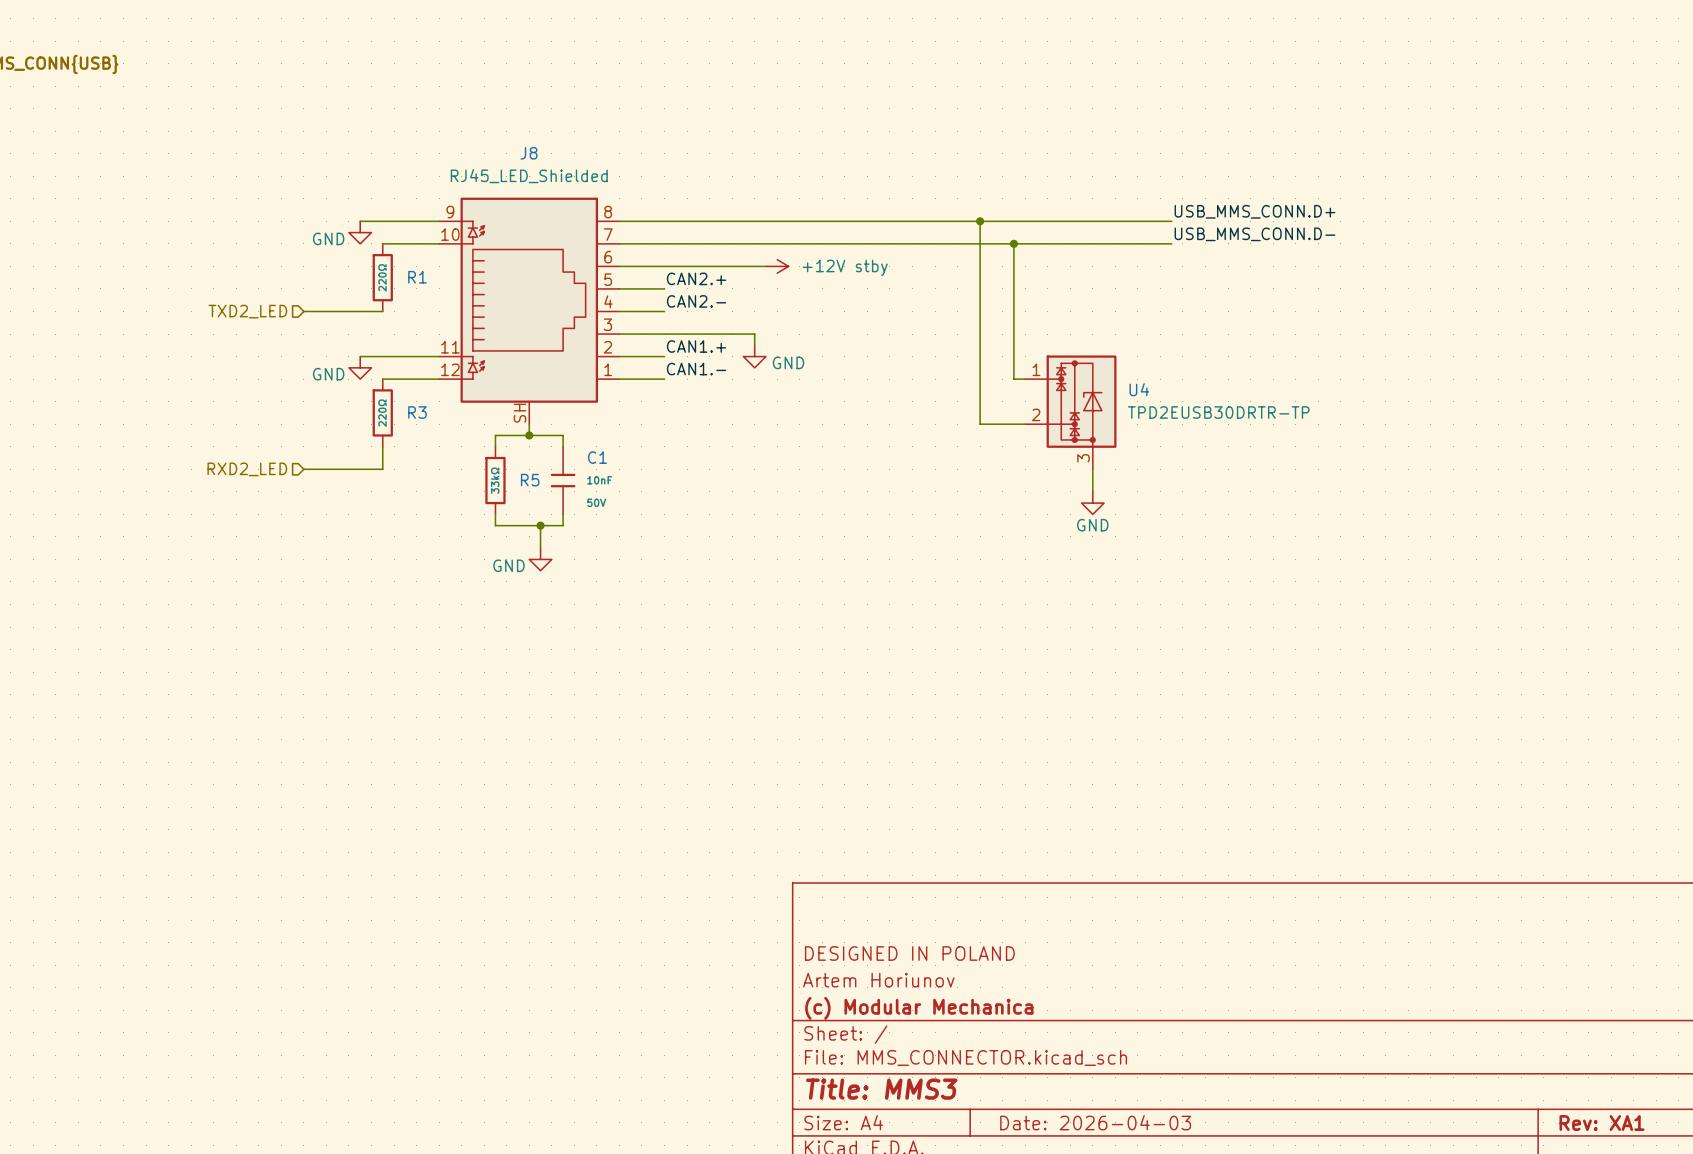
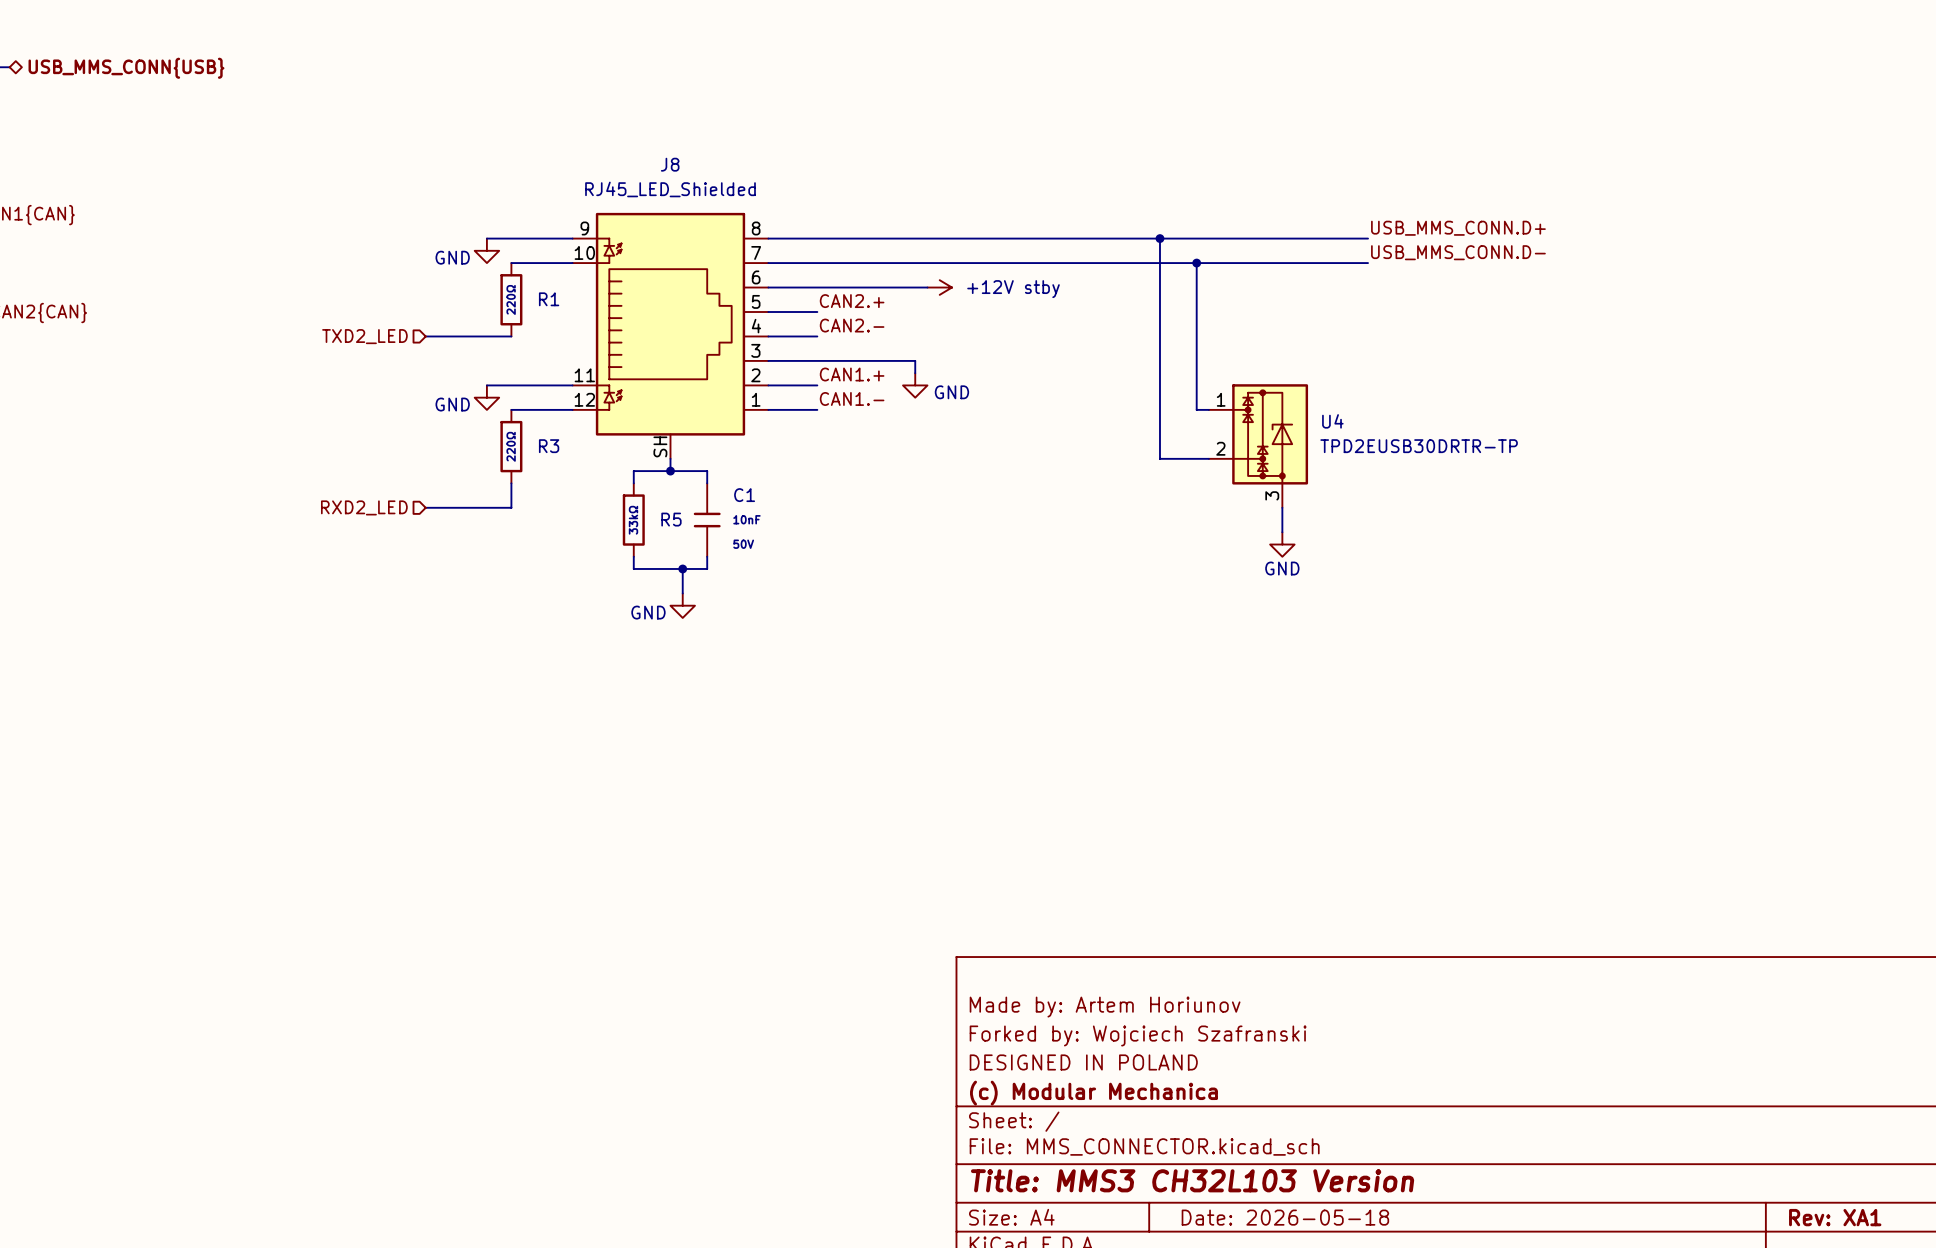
title block: none -> Made by: Artem Horiunov (1105, 1007)
title block: DESIGNED IN POLAND (909, 953) -> Forked by: Wojciech Szafranski (1138, 1035)
title block: Artem Horiunov (878, 980) -> DESIGNED IN POLAND (1083, 1062)
title block: Title: MMS3 (881, 1089) -> Title: MMS3 CH32L103 Version (1192, 1180)
title block: Date: 2026-04-03 (1095, 1122) -> Date: 2026-05-18 (1285, 1217)

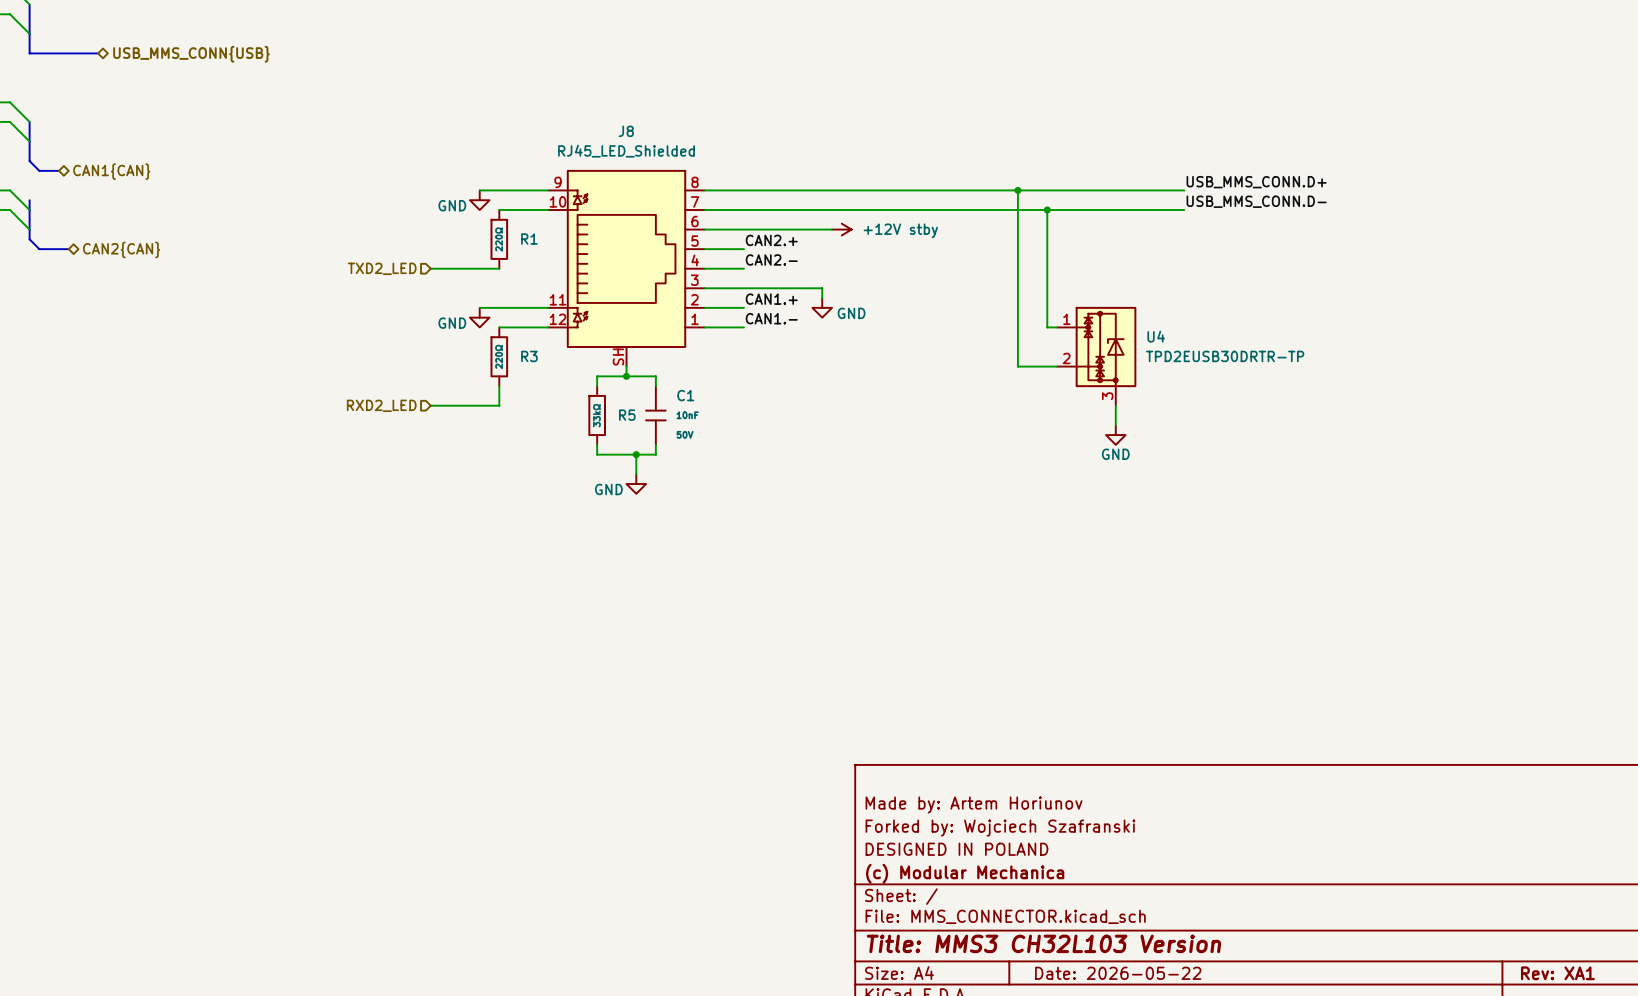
title block: Date: 2026-05-18 (1285, 1217) -> Date: 2026-05-22 (1118, 973)

